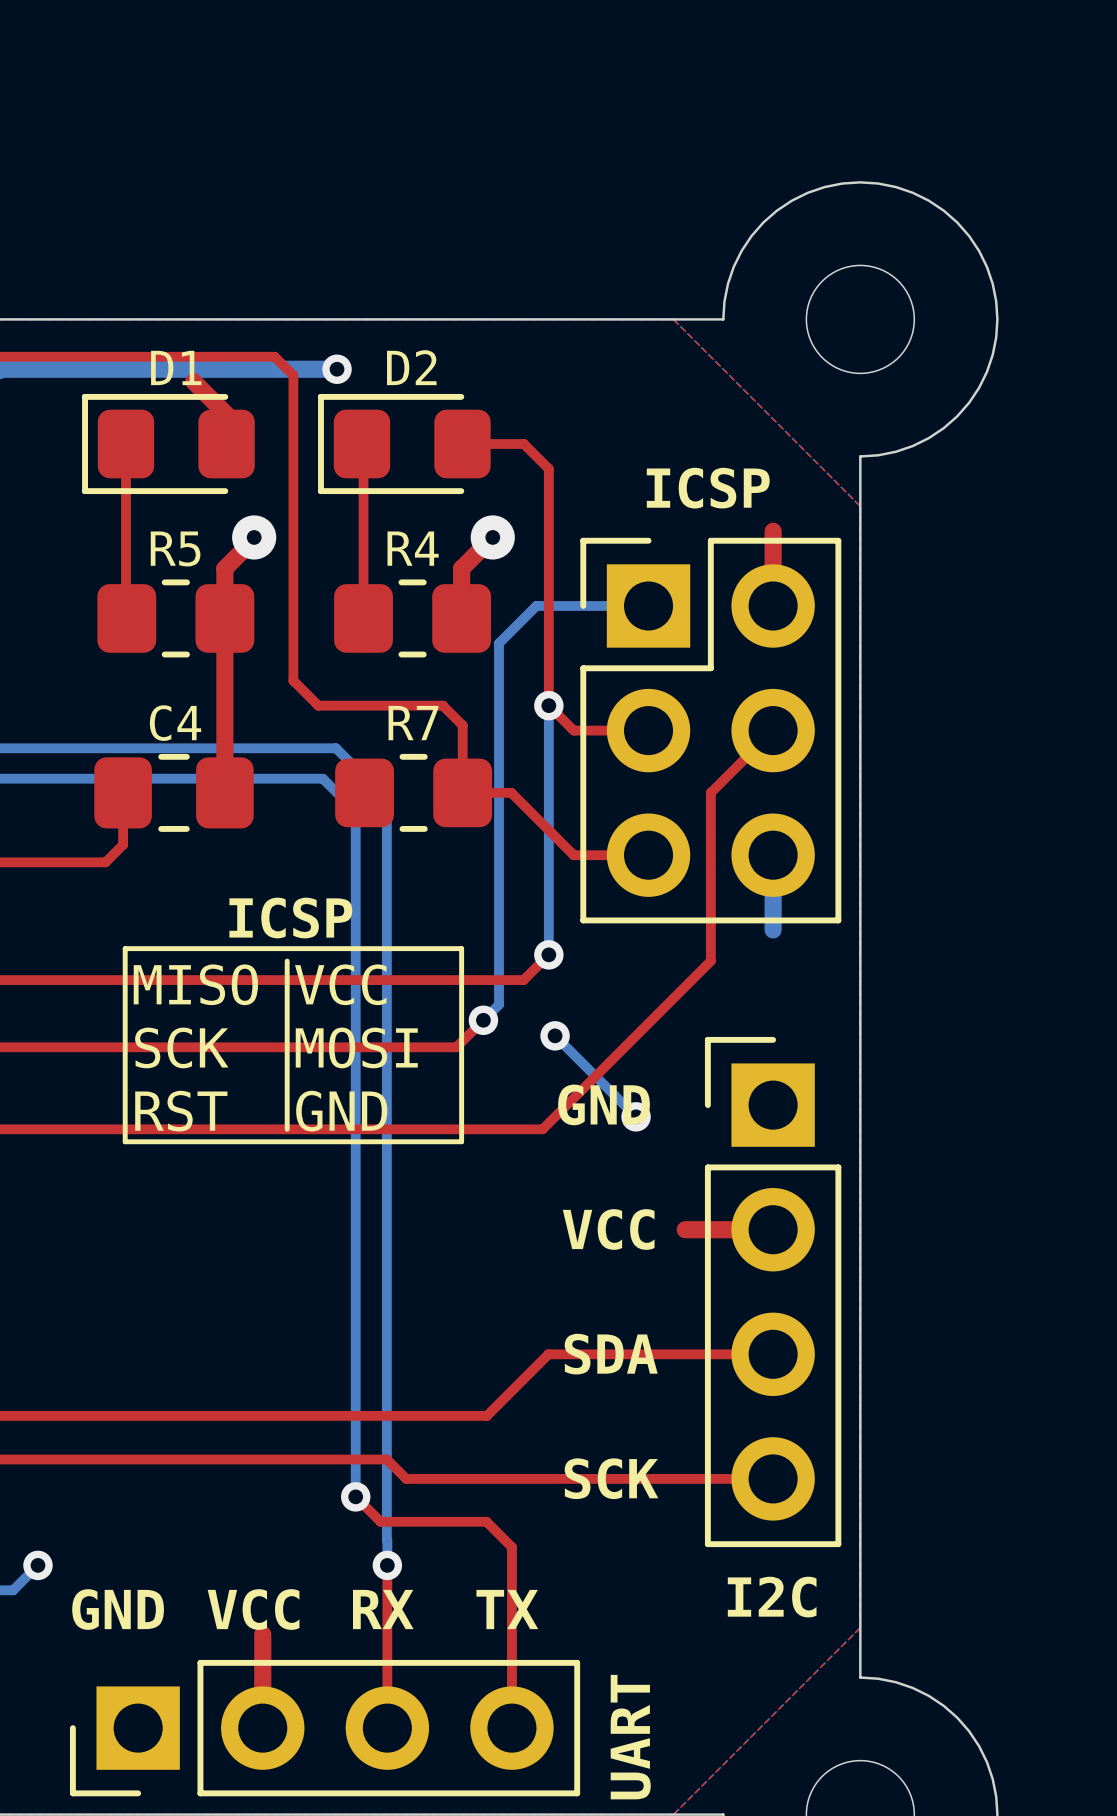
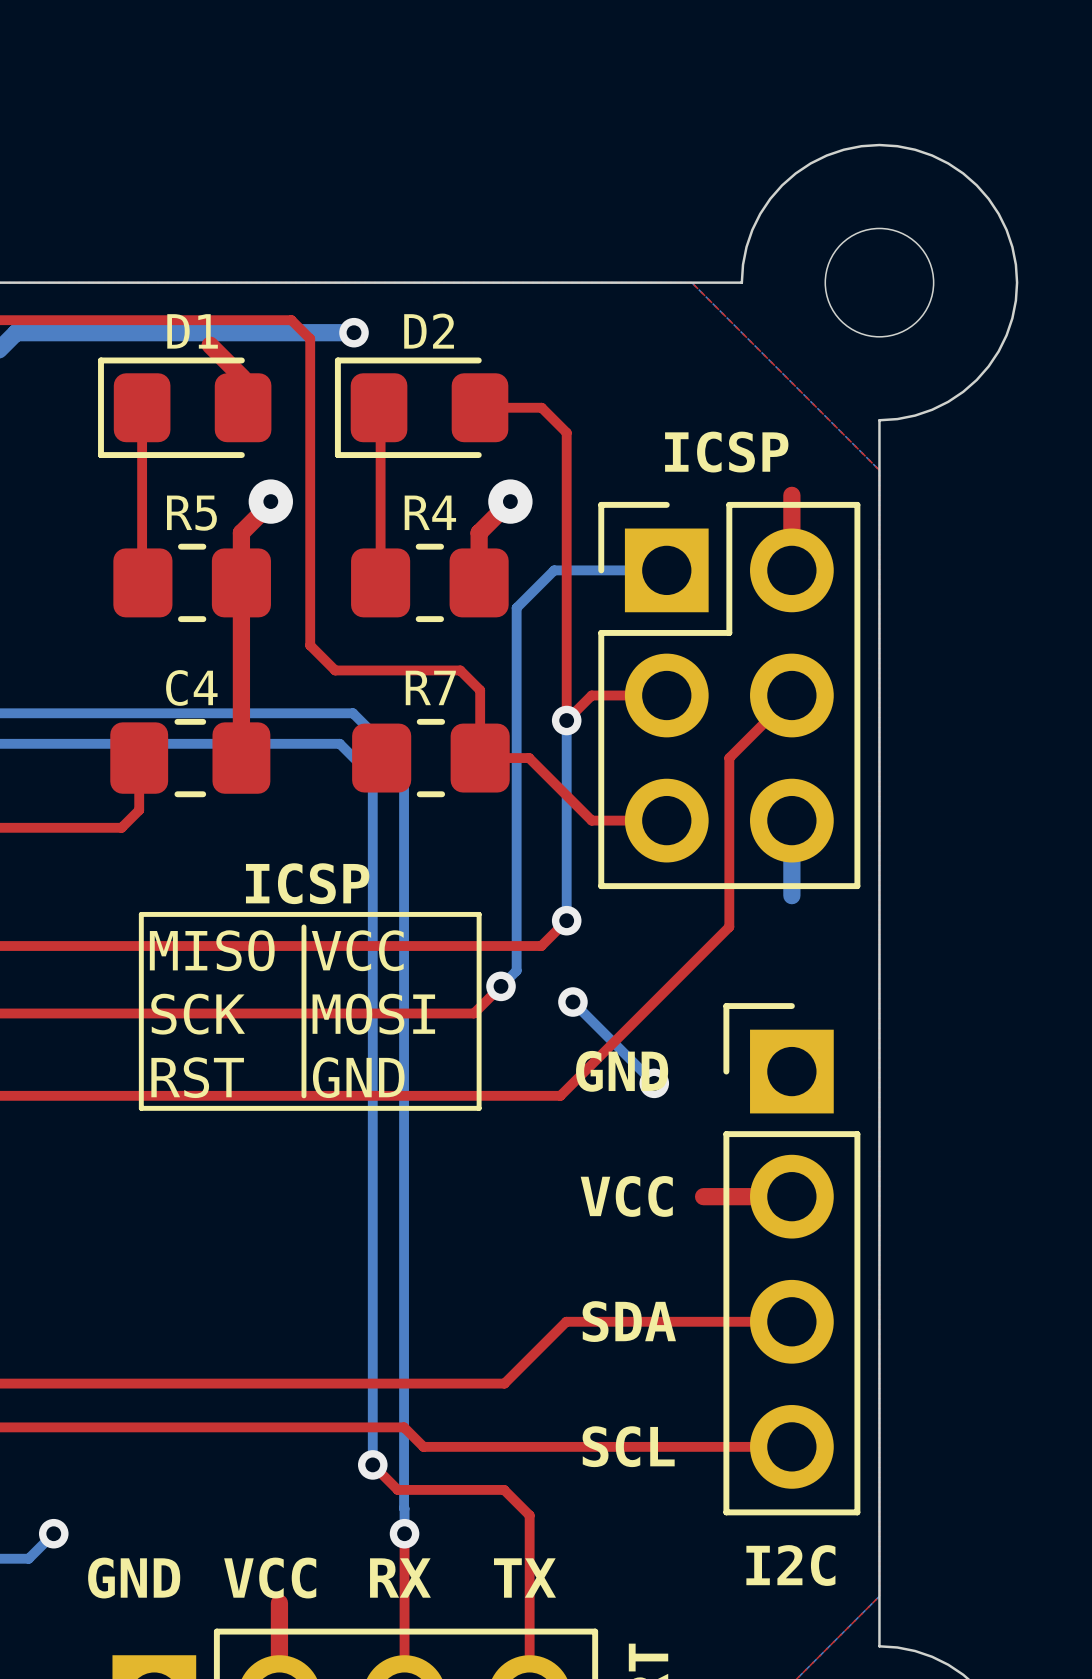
top track: (548, 705) (573, 730) -> (566, 670) (566, 720) (591, 695)
bottom track: (548, 705) (548, 755) -> none
via position: (548, 705) -> (566, 720)
text: SCK (611, 1478) -> SCL (628, 1446)

